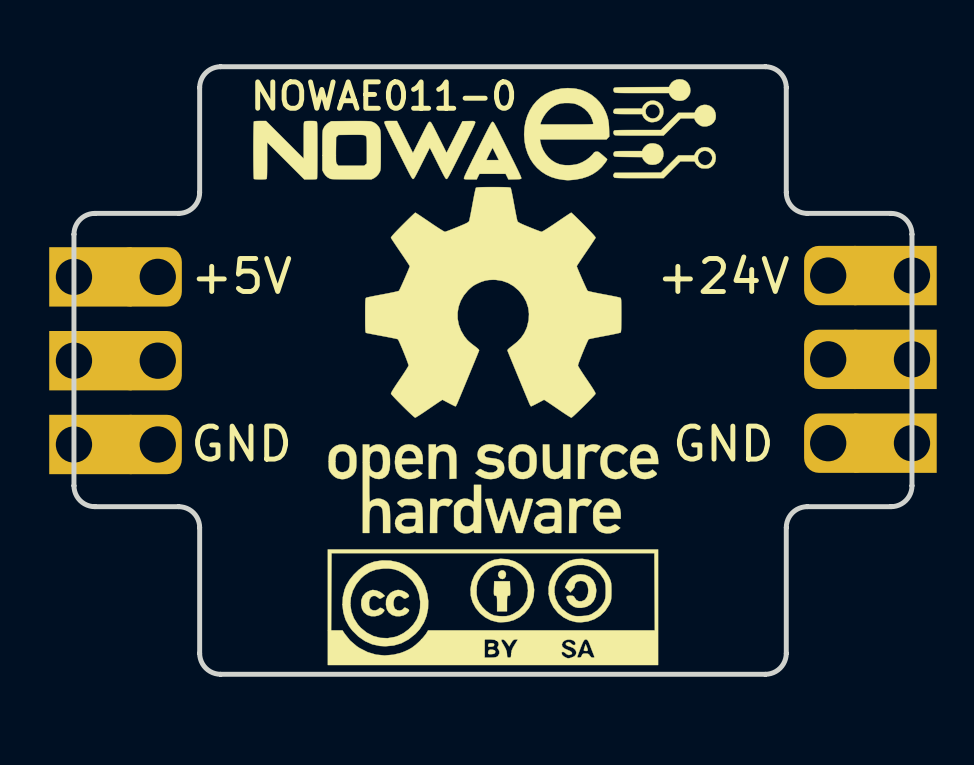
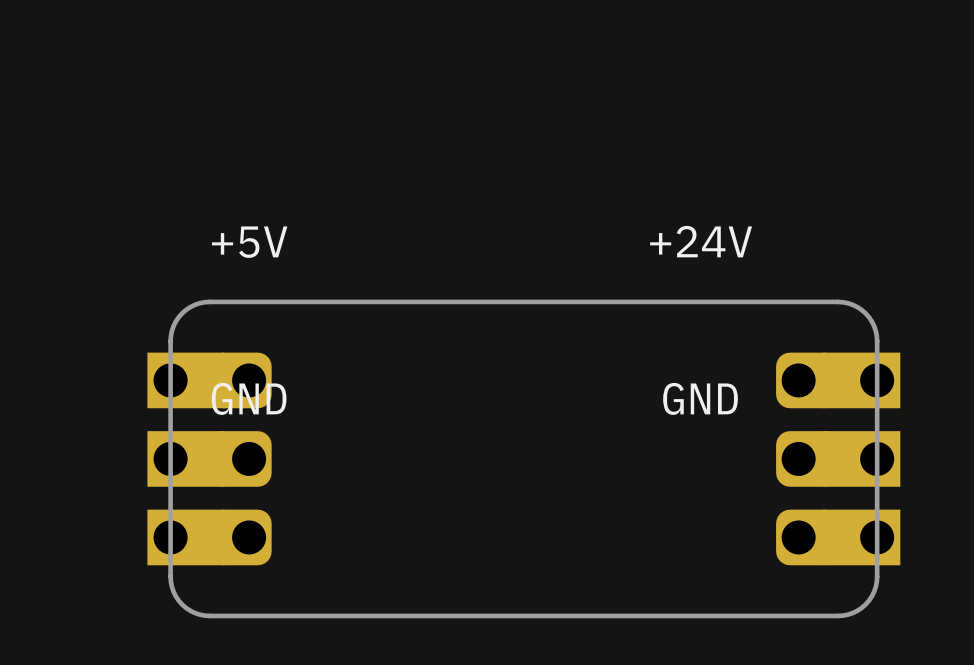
board edge: (220, 66) (765, 66) (773, 68) (781, 74) (786, 84) (786, 192) (790, 205) (796, 210) (804, 213) (893, 213) (903, 217) (910, 226) (911, 234) (911, 380) -> (229, 615) (204, 615) (190, 610) (178, 600) (170, 581) (170, 336) (178, 317) (194, 304) (209, 301) (837, 301) (852, 304) (865, 313) (874, 326) (877, 341)
board edge: (220, 66) (212, 68) (205, 72) (199, 84) (199, 192) (195, 205) (189, 210) (181, 213) (89, 214) (78, 221) (73, 234) (74, 491) (80, 500) (92, 506) (181, 506) (189, 509) (195, 514) (199, 527) (199, 656) (205, 668) (212, 672) (220, 674) -> none
drawing: [253, 79, 716, 666] -> none
text: NOWAE011-0 (384, 95) -> none
part position: (870, 359) -> (838, 458)
part position: (115, 360) -> (209, 458)
board edge: (911, 485) (907, 498) (896, 505) (804, 506) (796, 509) (790, 514) (786, 527) (786, 656) (780, 668) (773, 672) (765, 674) -> (877, 439) (877, 576) (875, 586) (869, 600) (857, 610) (843, 615) (739, 615)

